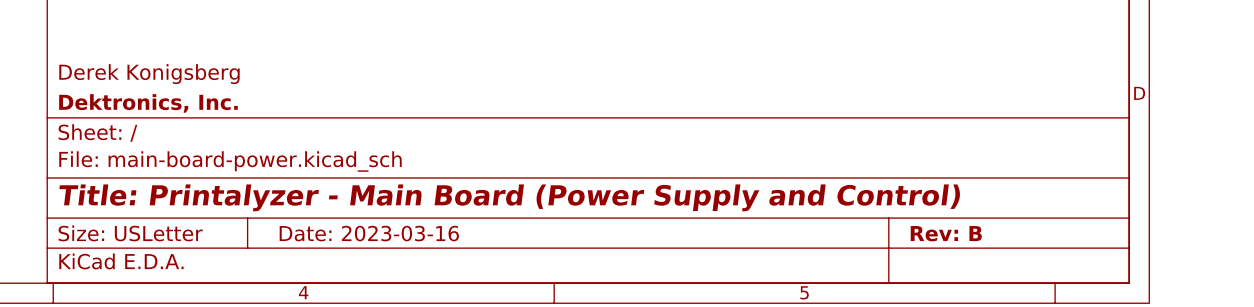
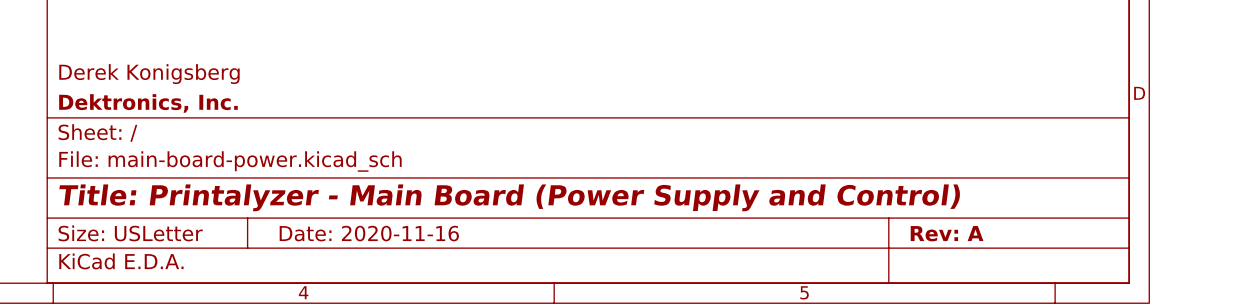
title block: Date: 2023-03-16 (369, 233) -> Date: 2020-11-16 (369, 233)
title block: Rev: B (946, 233) -> Rev: A (947, 233)

